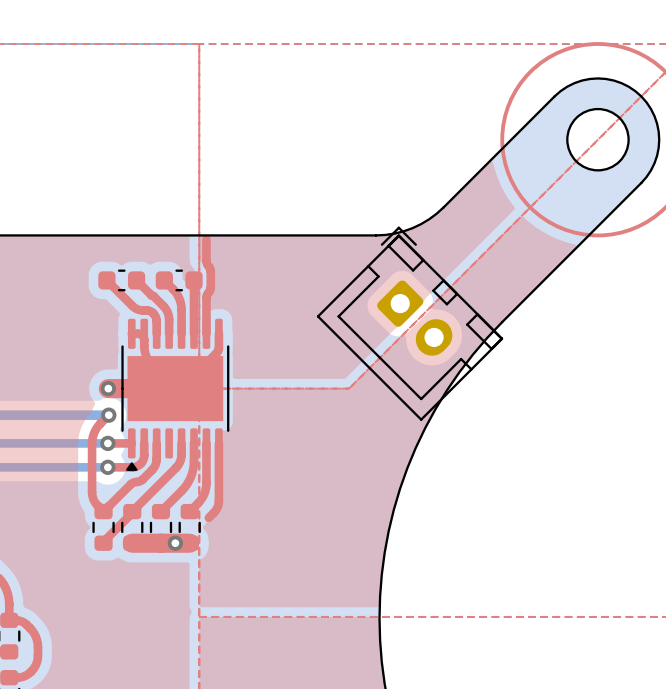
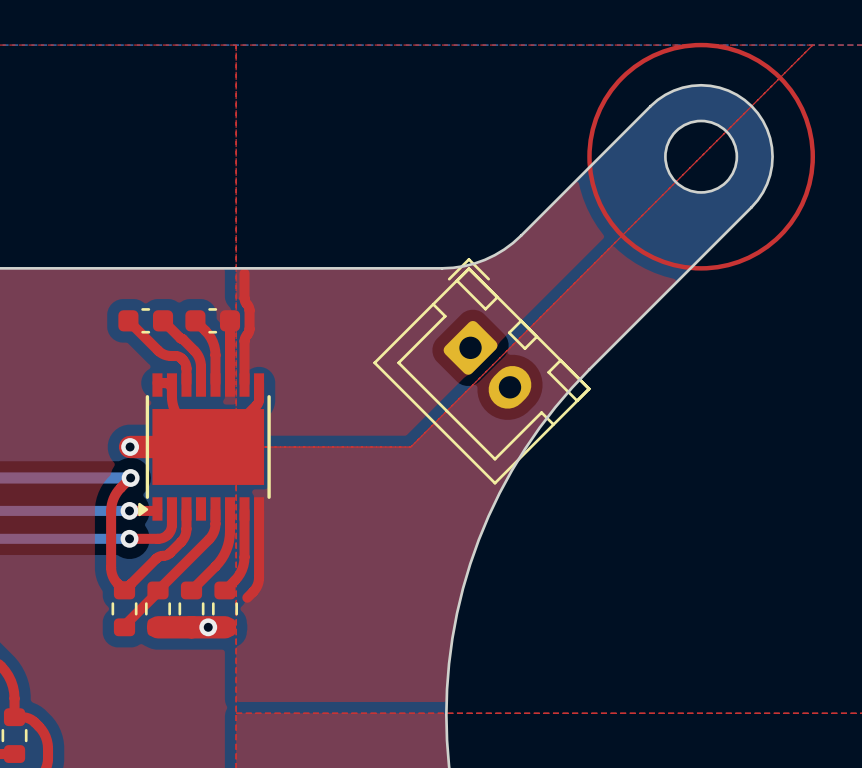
part footprint: [121, 318, 230, 471] -> [138, 373, 271, 521]

